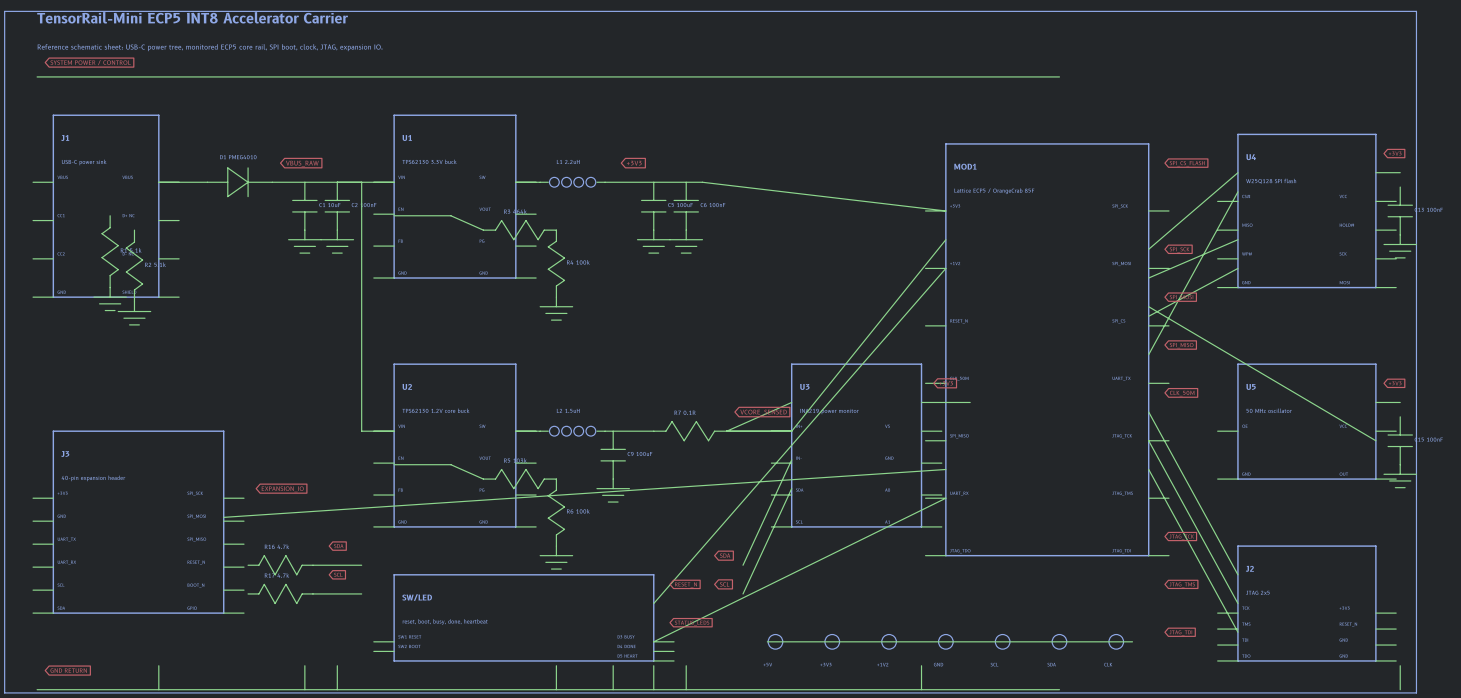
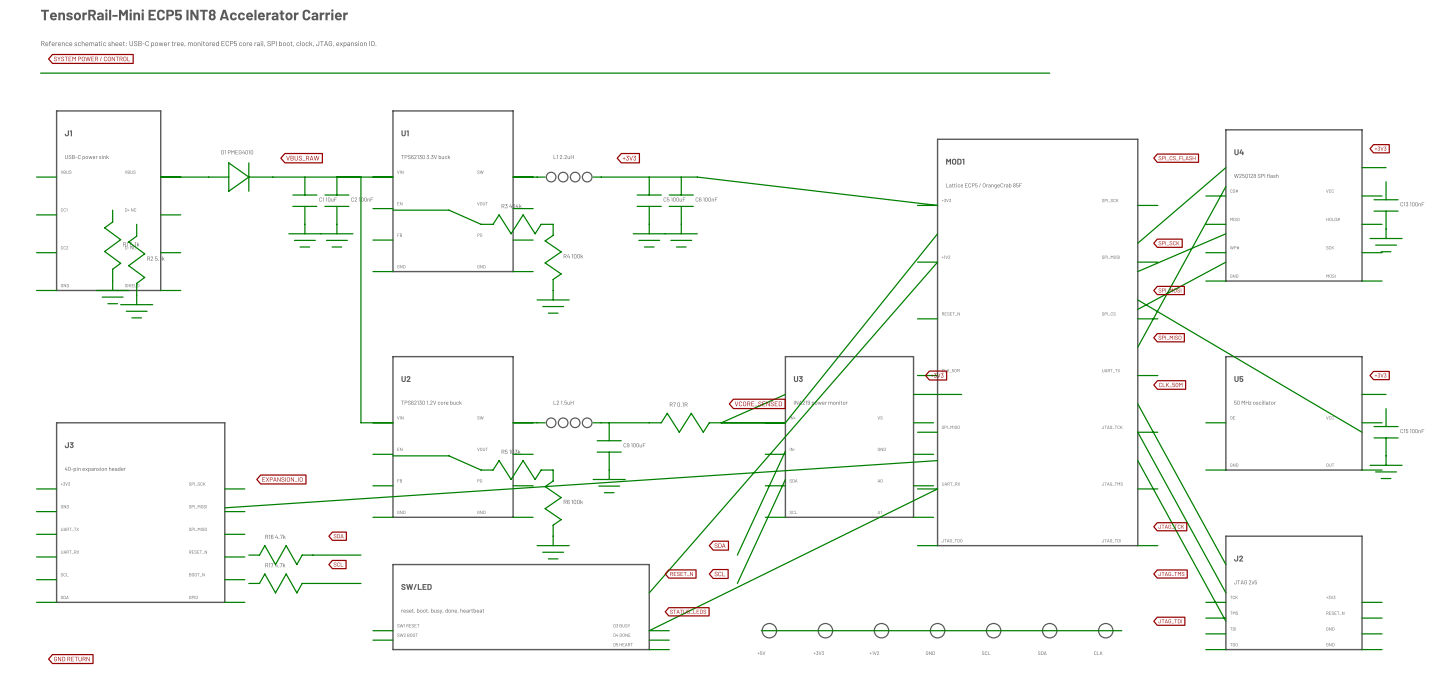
line: (4, 11) (1416, 11) (1416, 692) (4, 692) (4, 11) -> none
wire: (158, 665) (158, 689) -> none
wire: (304, 665) (304, 689) -> none
wire: (337, 665) (337, 689) -> none
wire: (556, 665) (556, 689) -> none
wire: (613, 665) (613, 689) -> none
wire: (653, 665) (653, 689) -> none
wire: (686, 665) (686, 689) -> none
wire: (921, 665) (921, 689) -> none
wire: (1400, 665) (1400, 689) -> none
wire: (37, 689) (1059, 689) -> none

